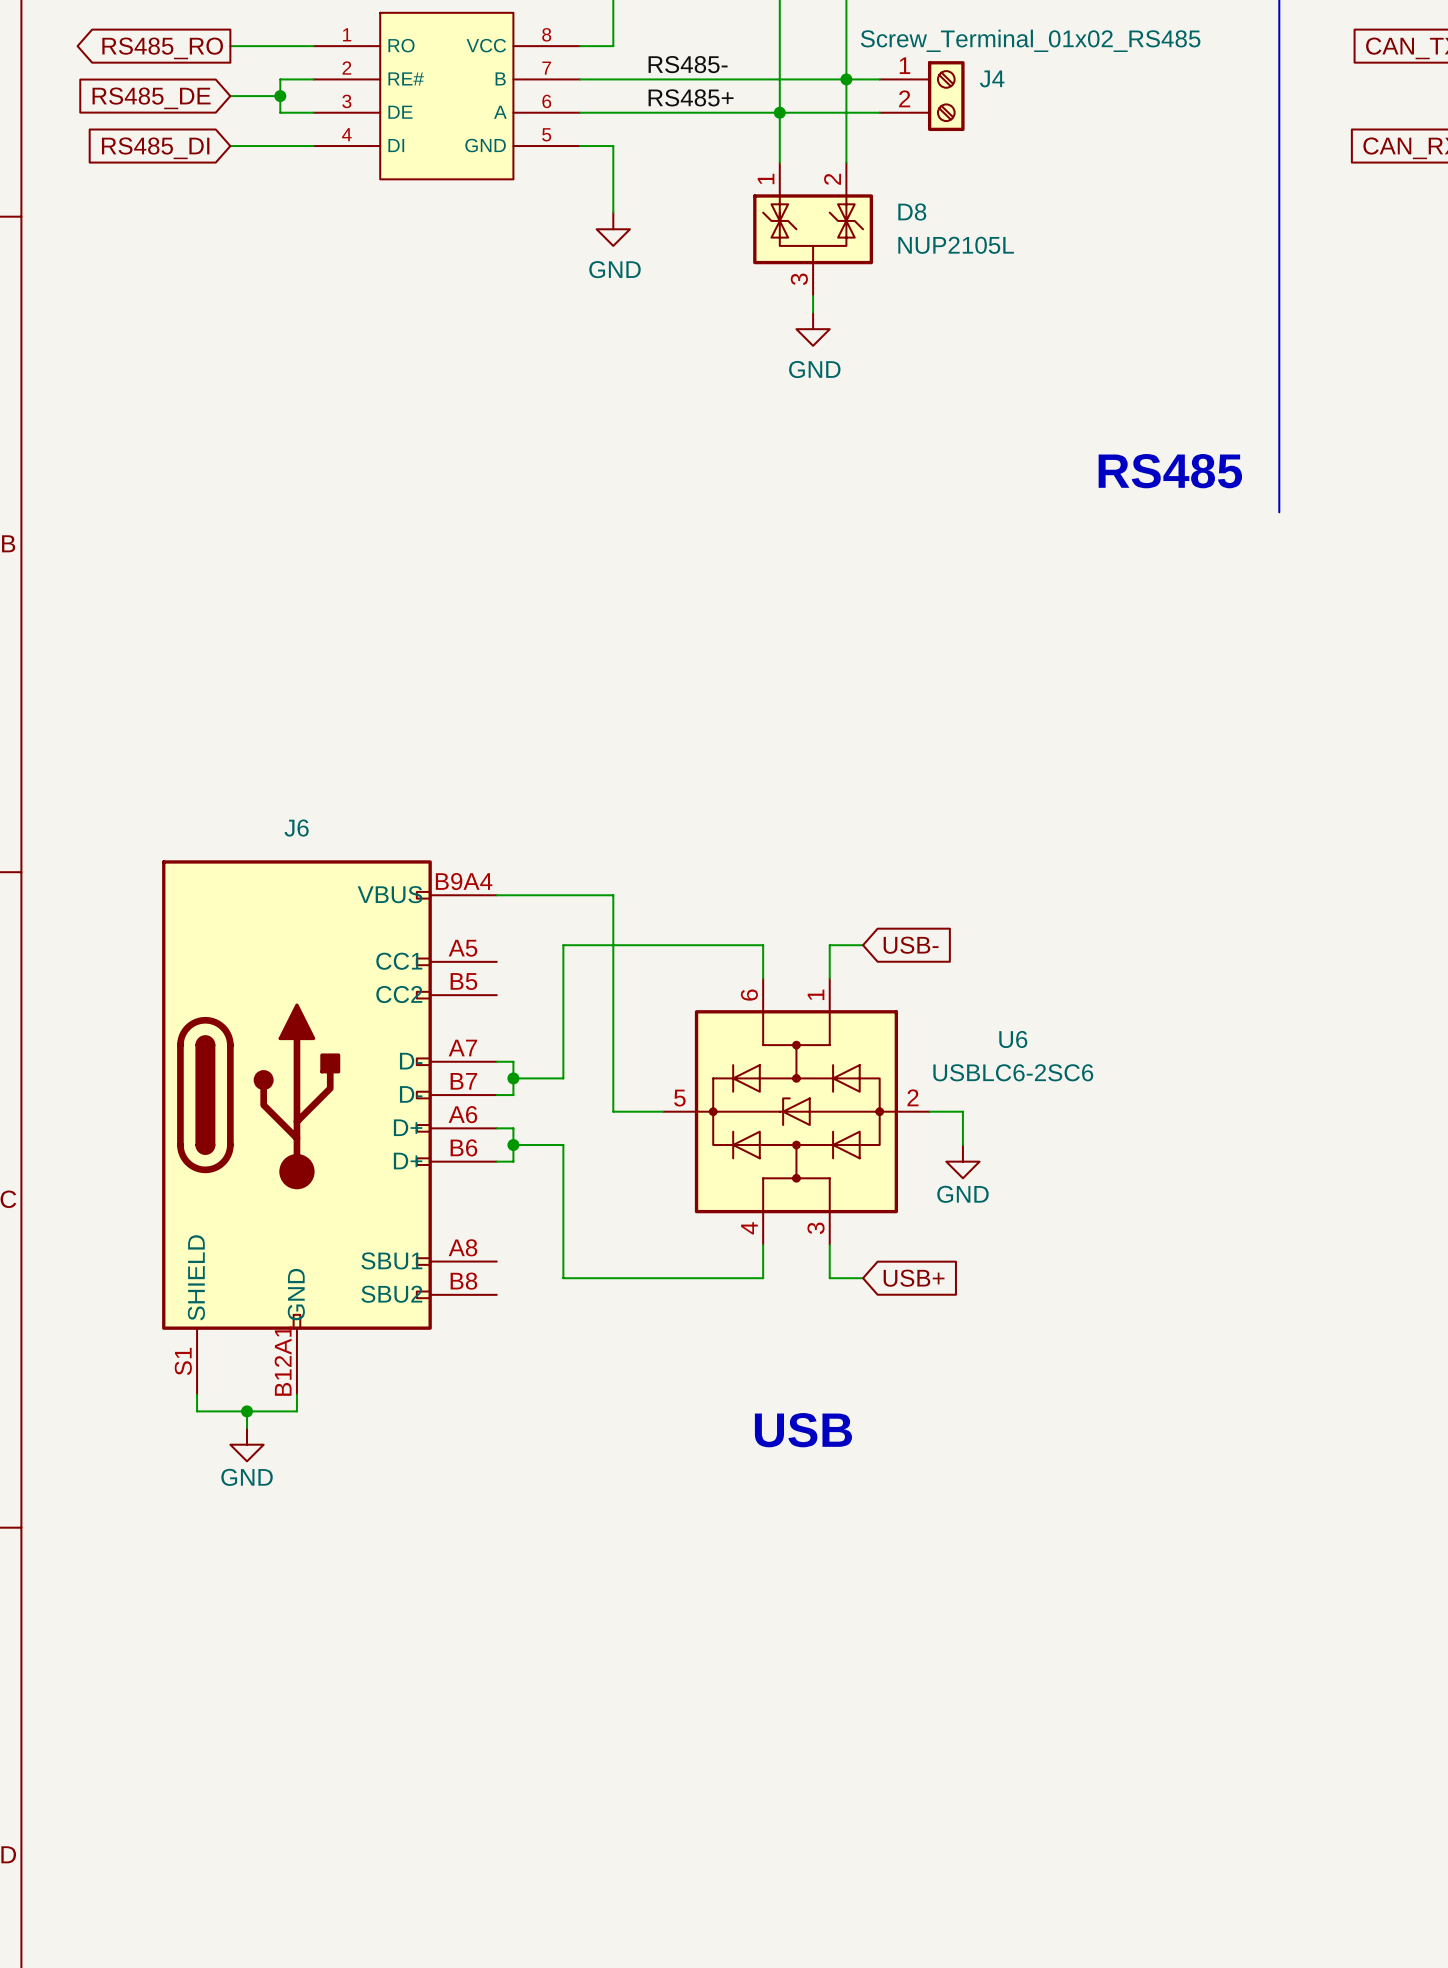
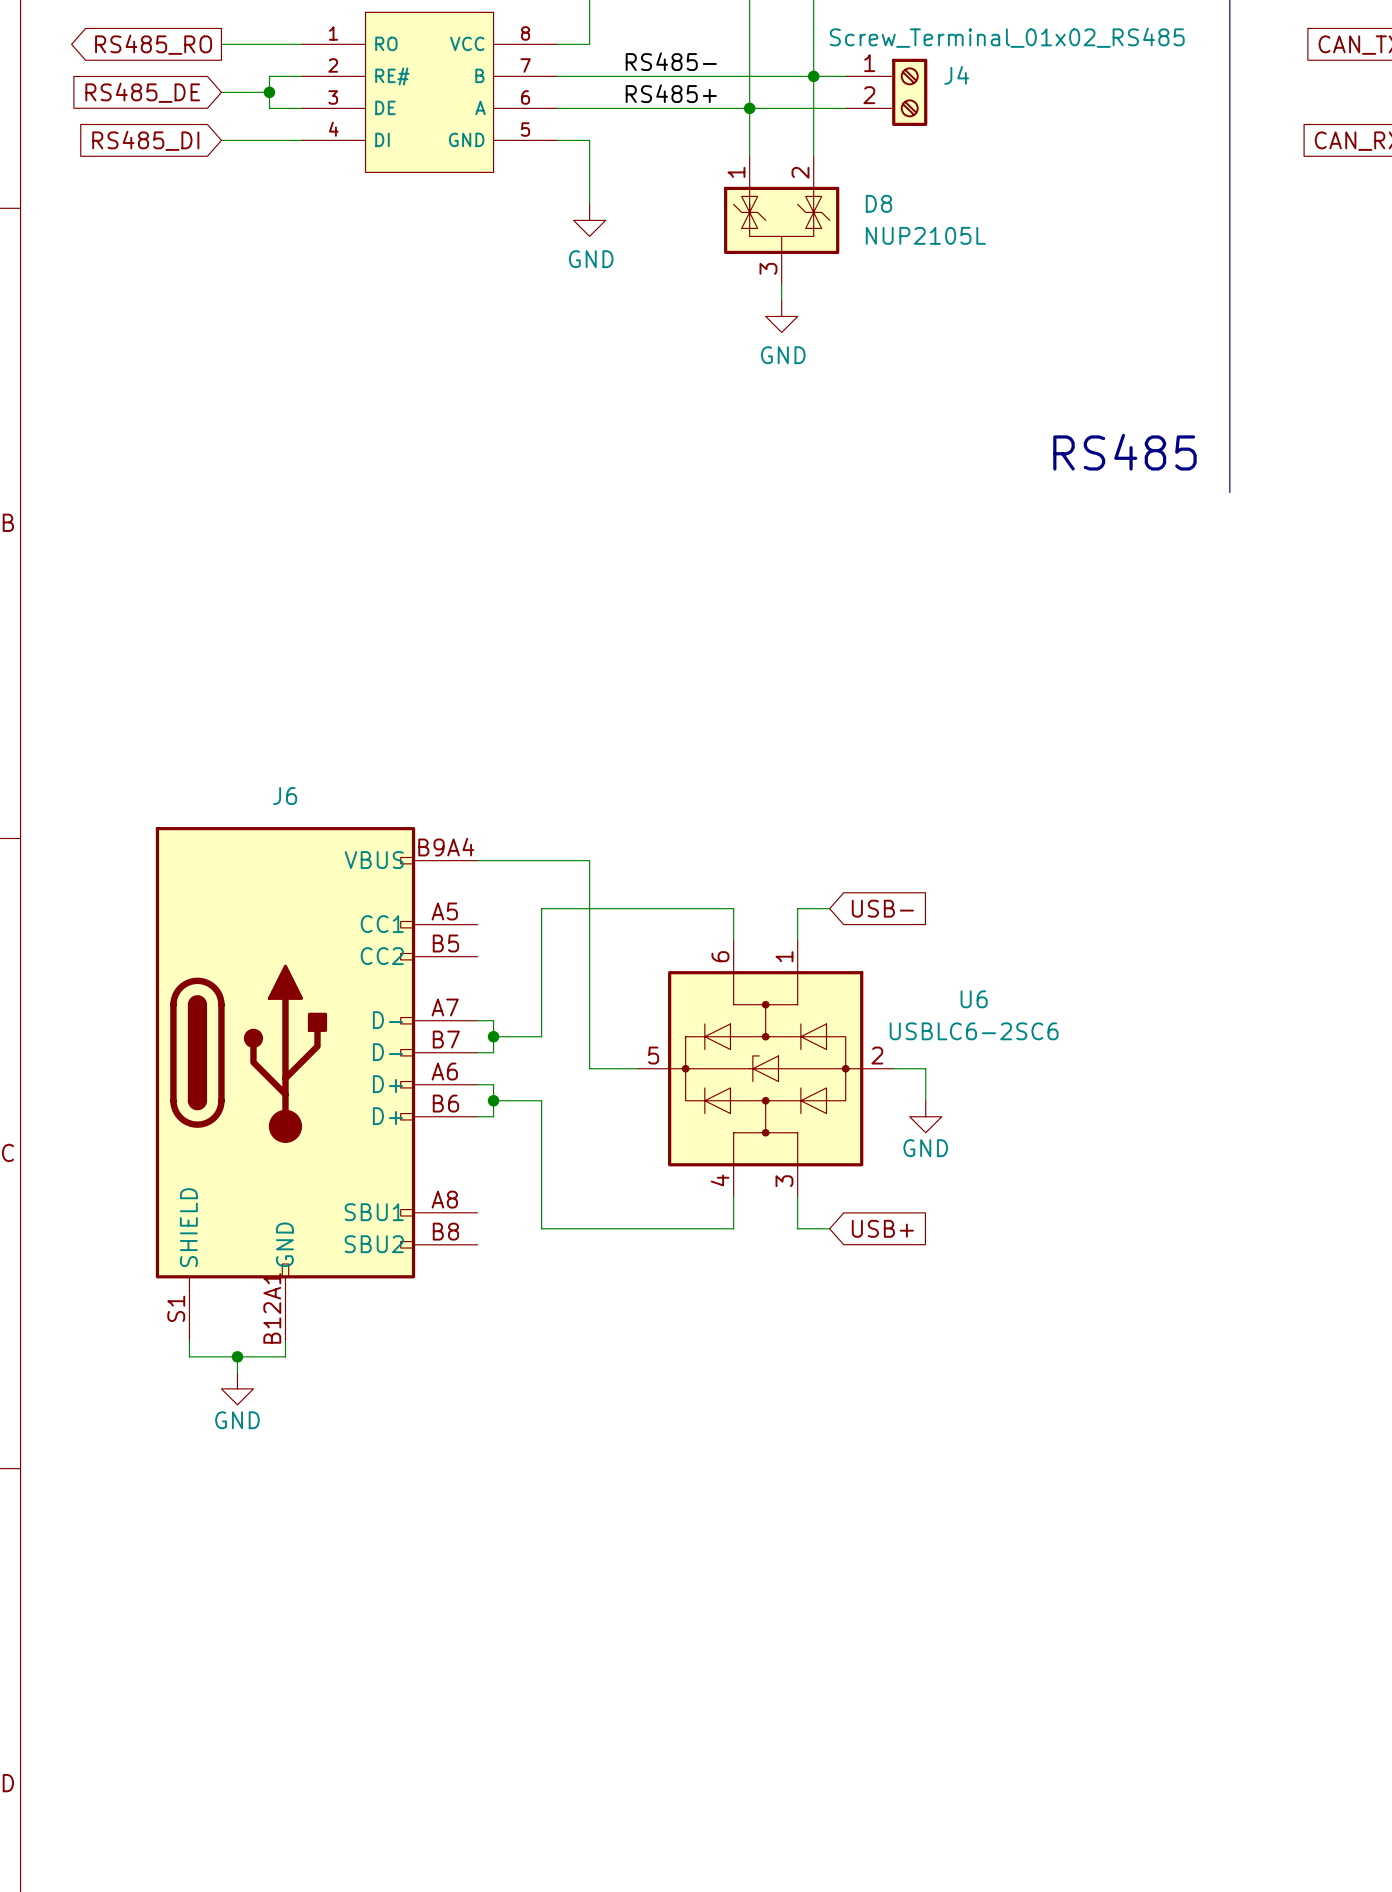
text: USB (803, 1430) -> none

